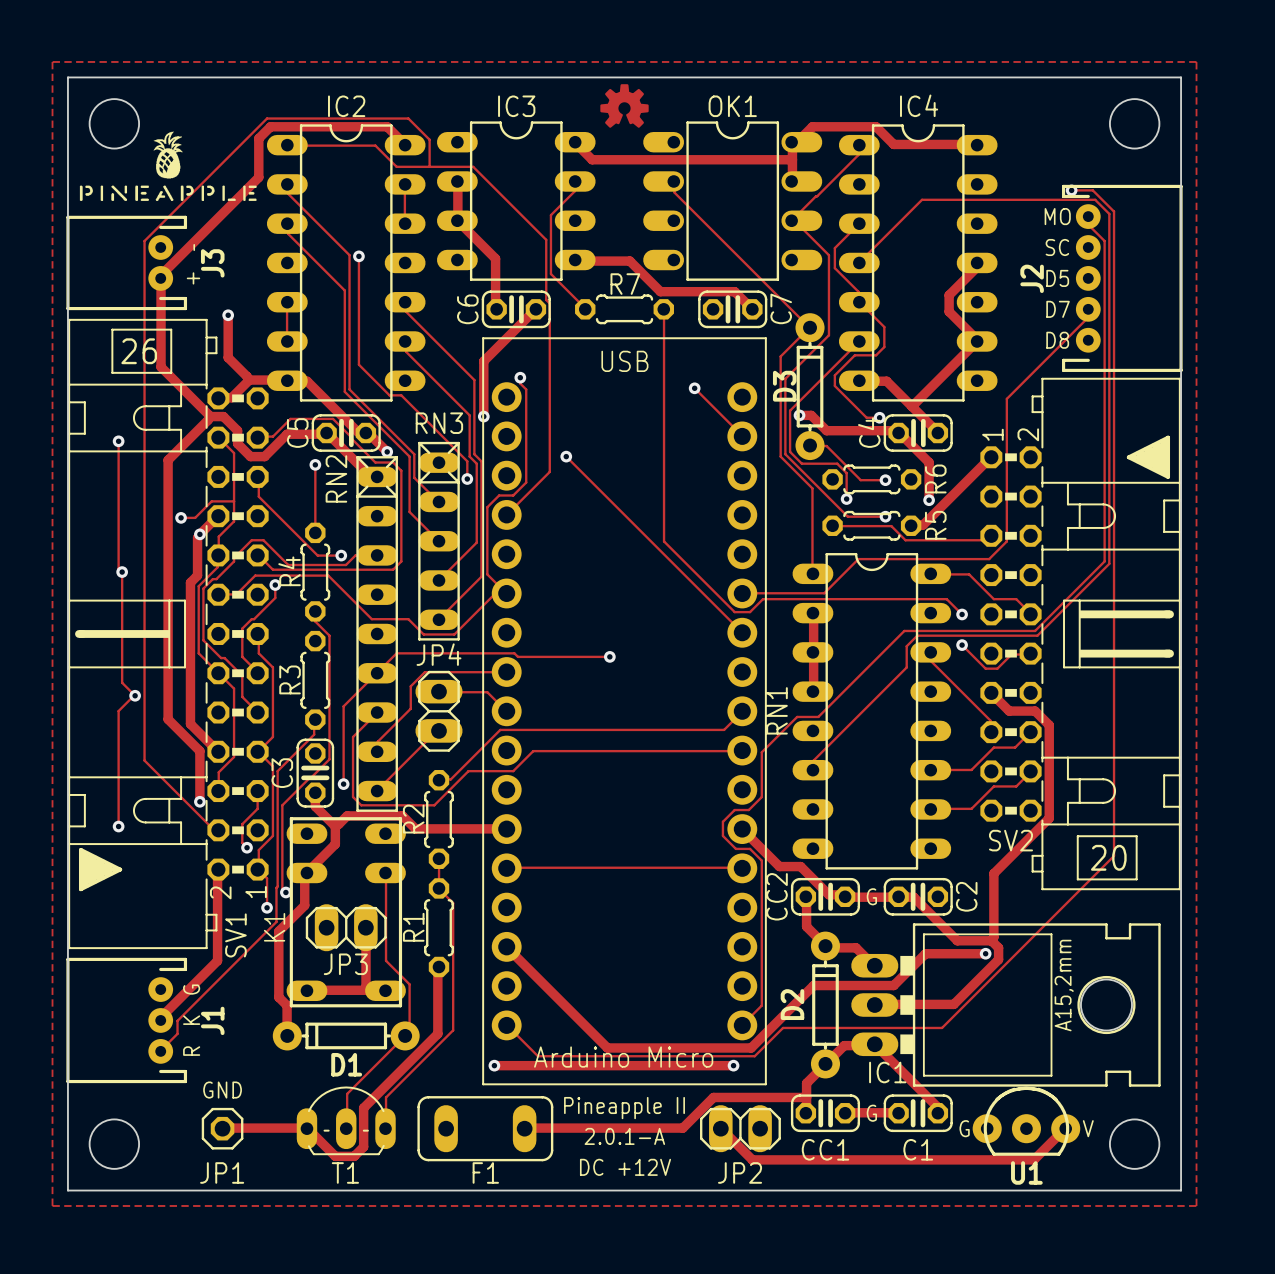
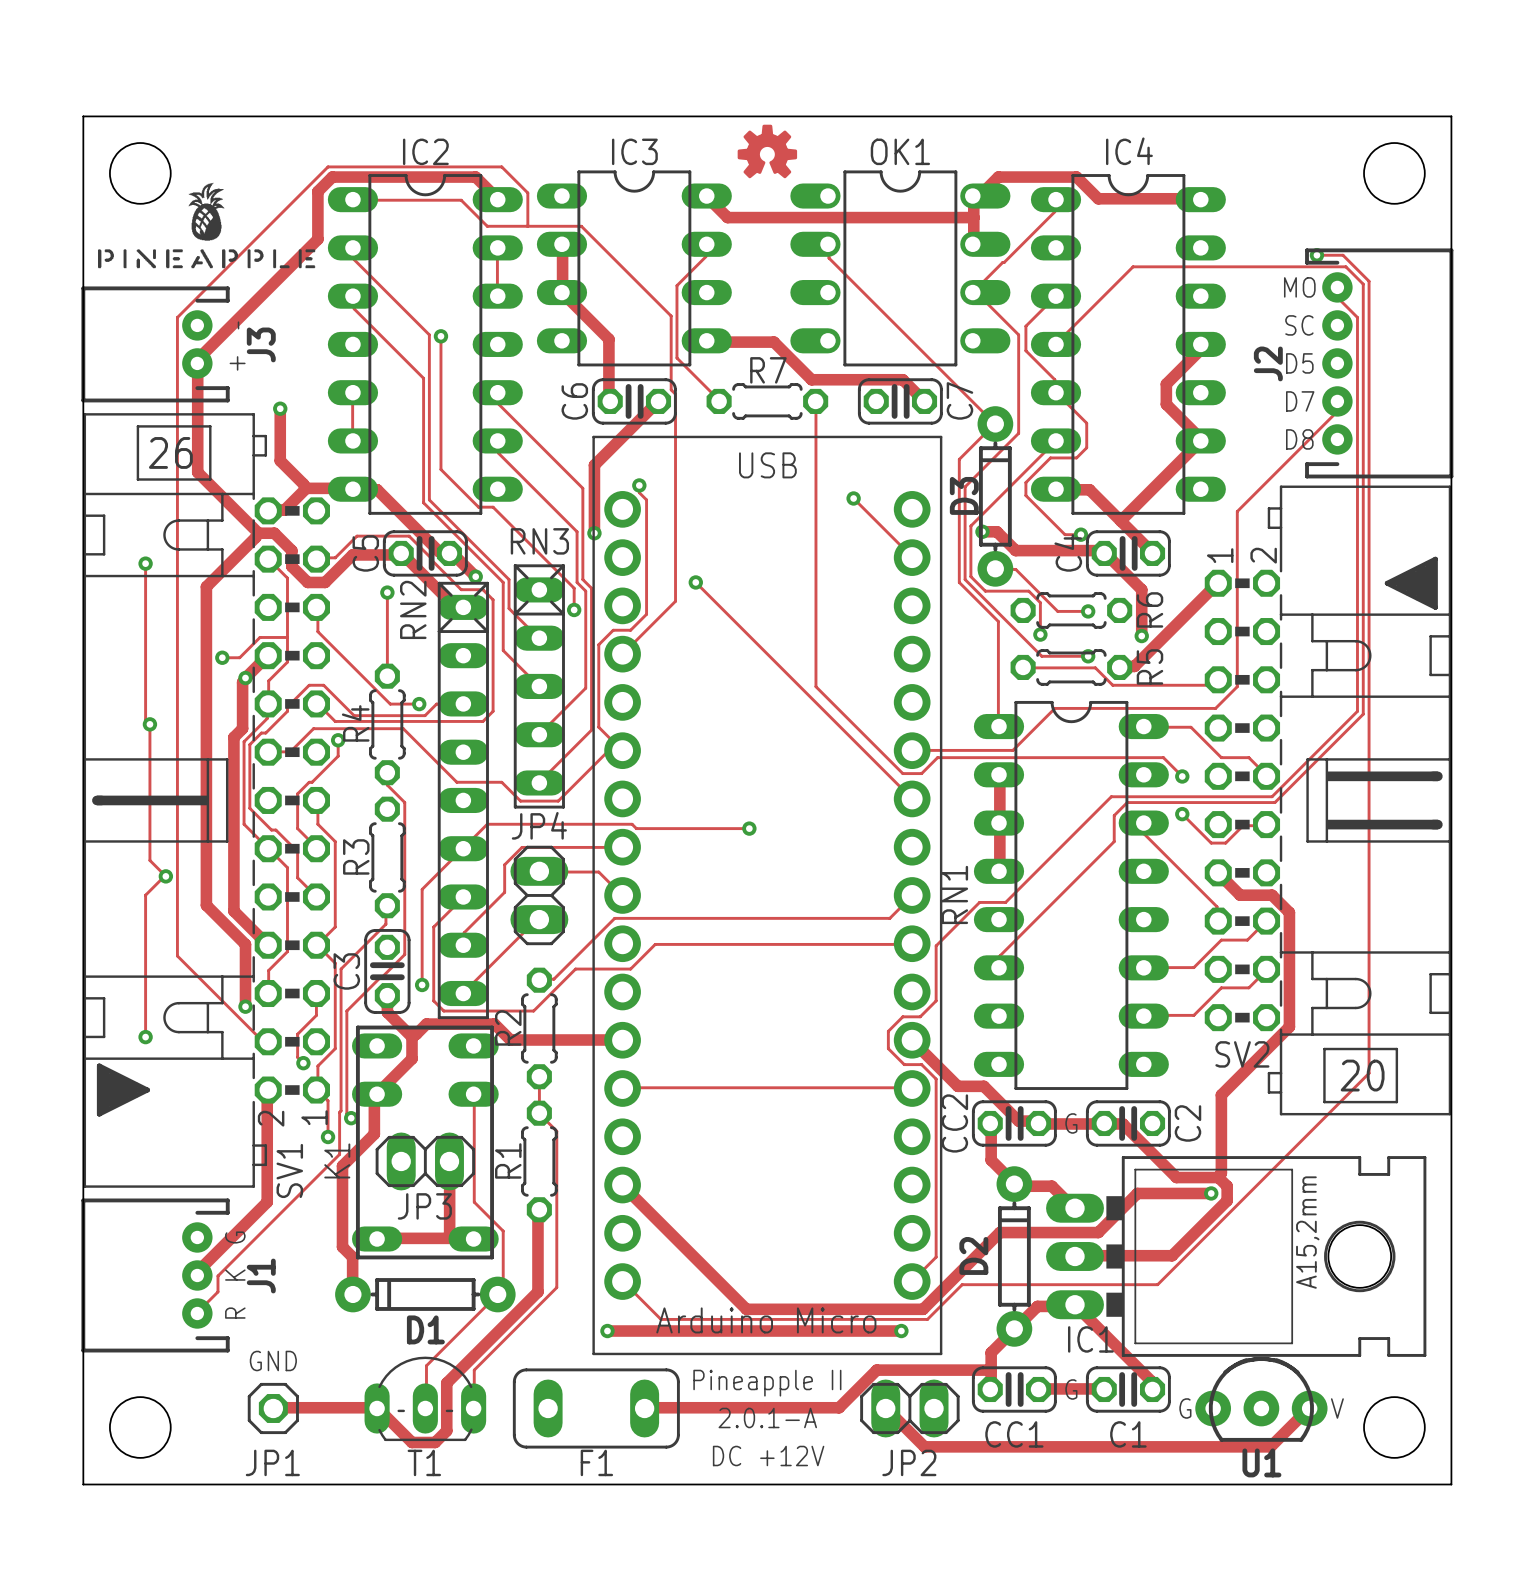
zone outline: (52, 61) (1196, 61) (1196, 1205) (52, 1205) (52, 61) -> none

